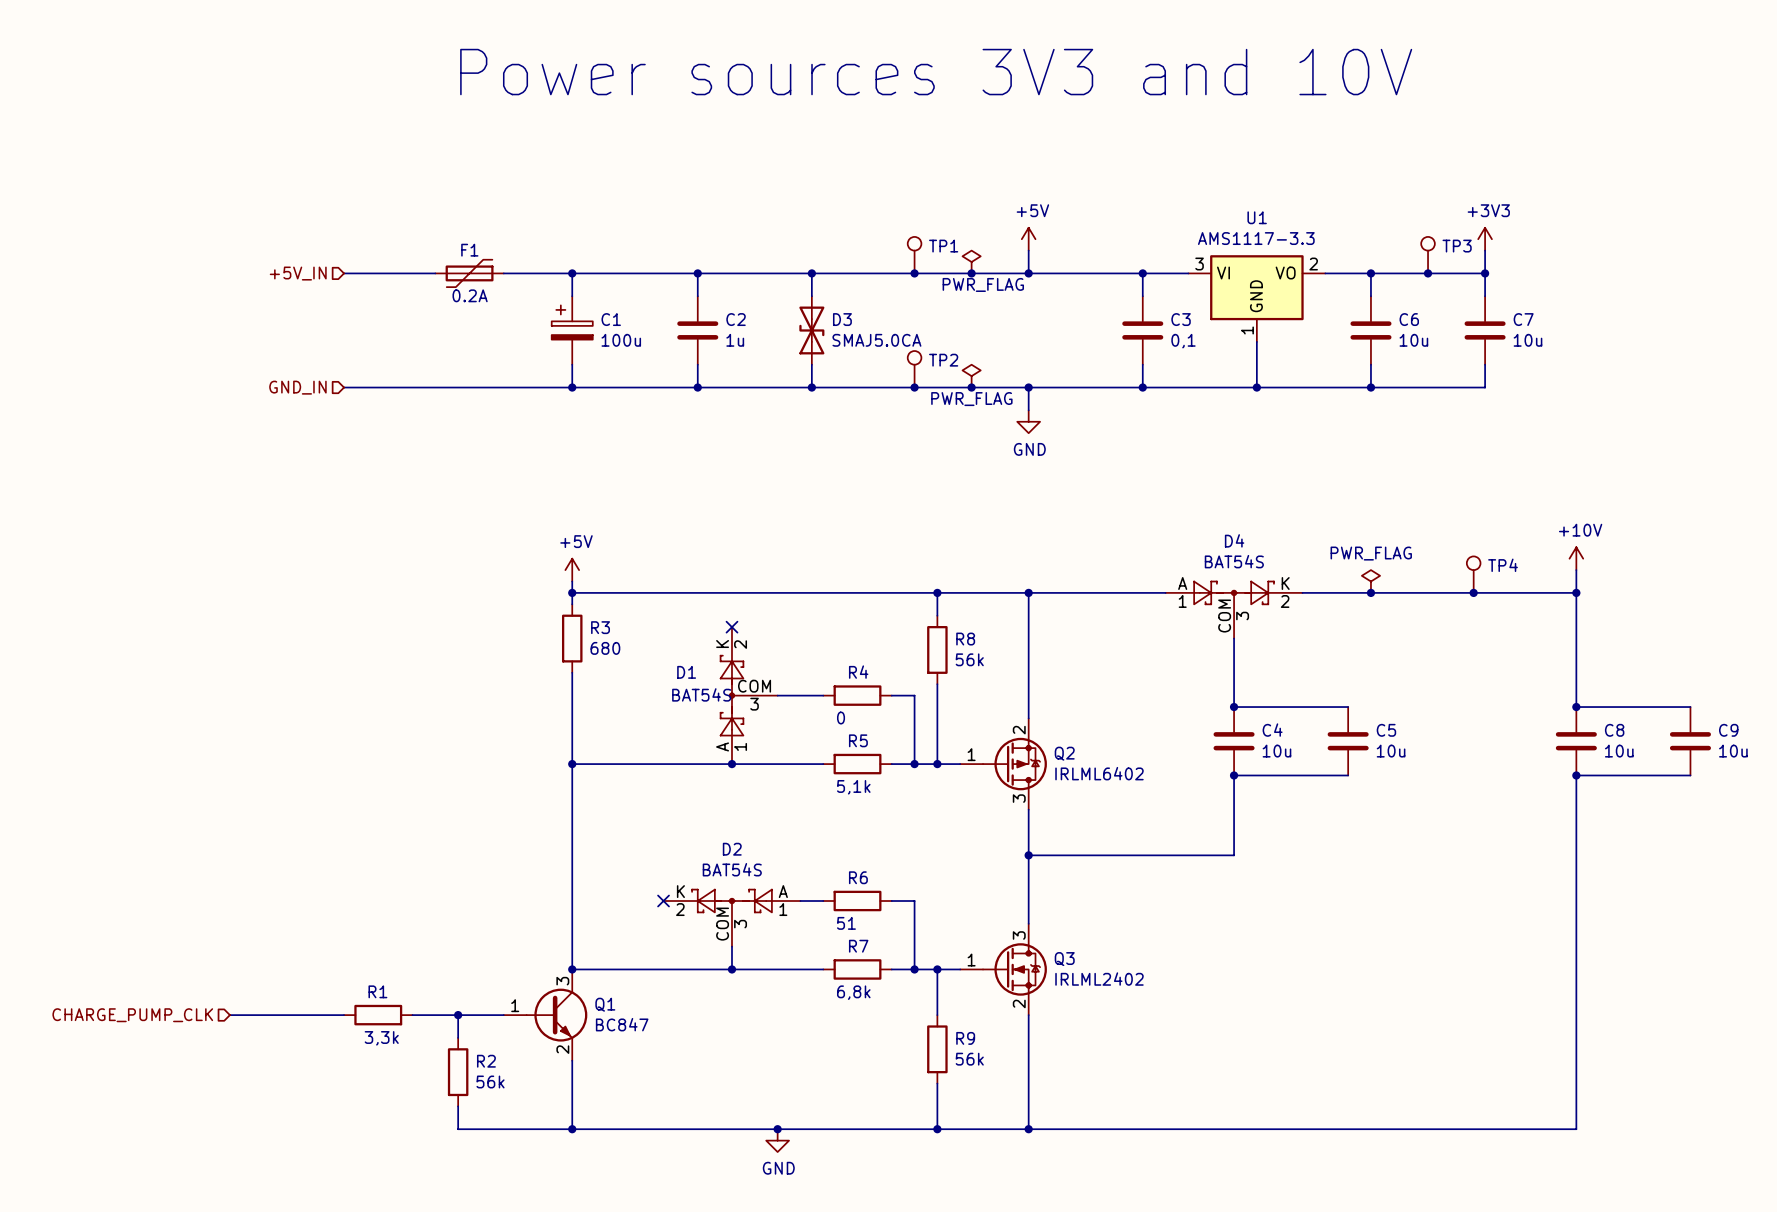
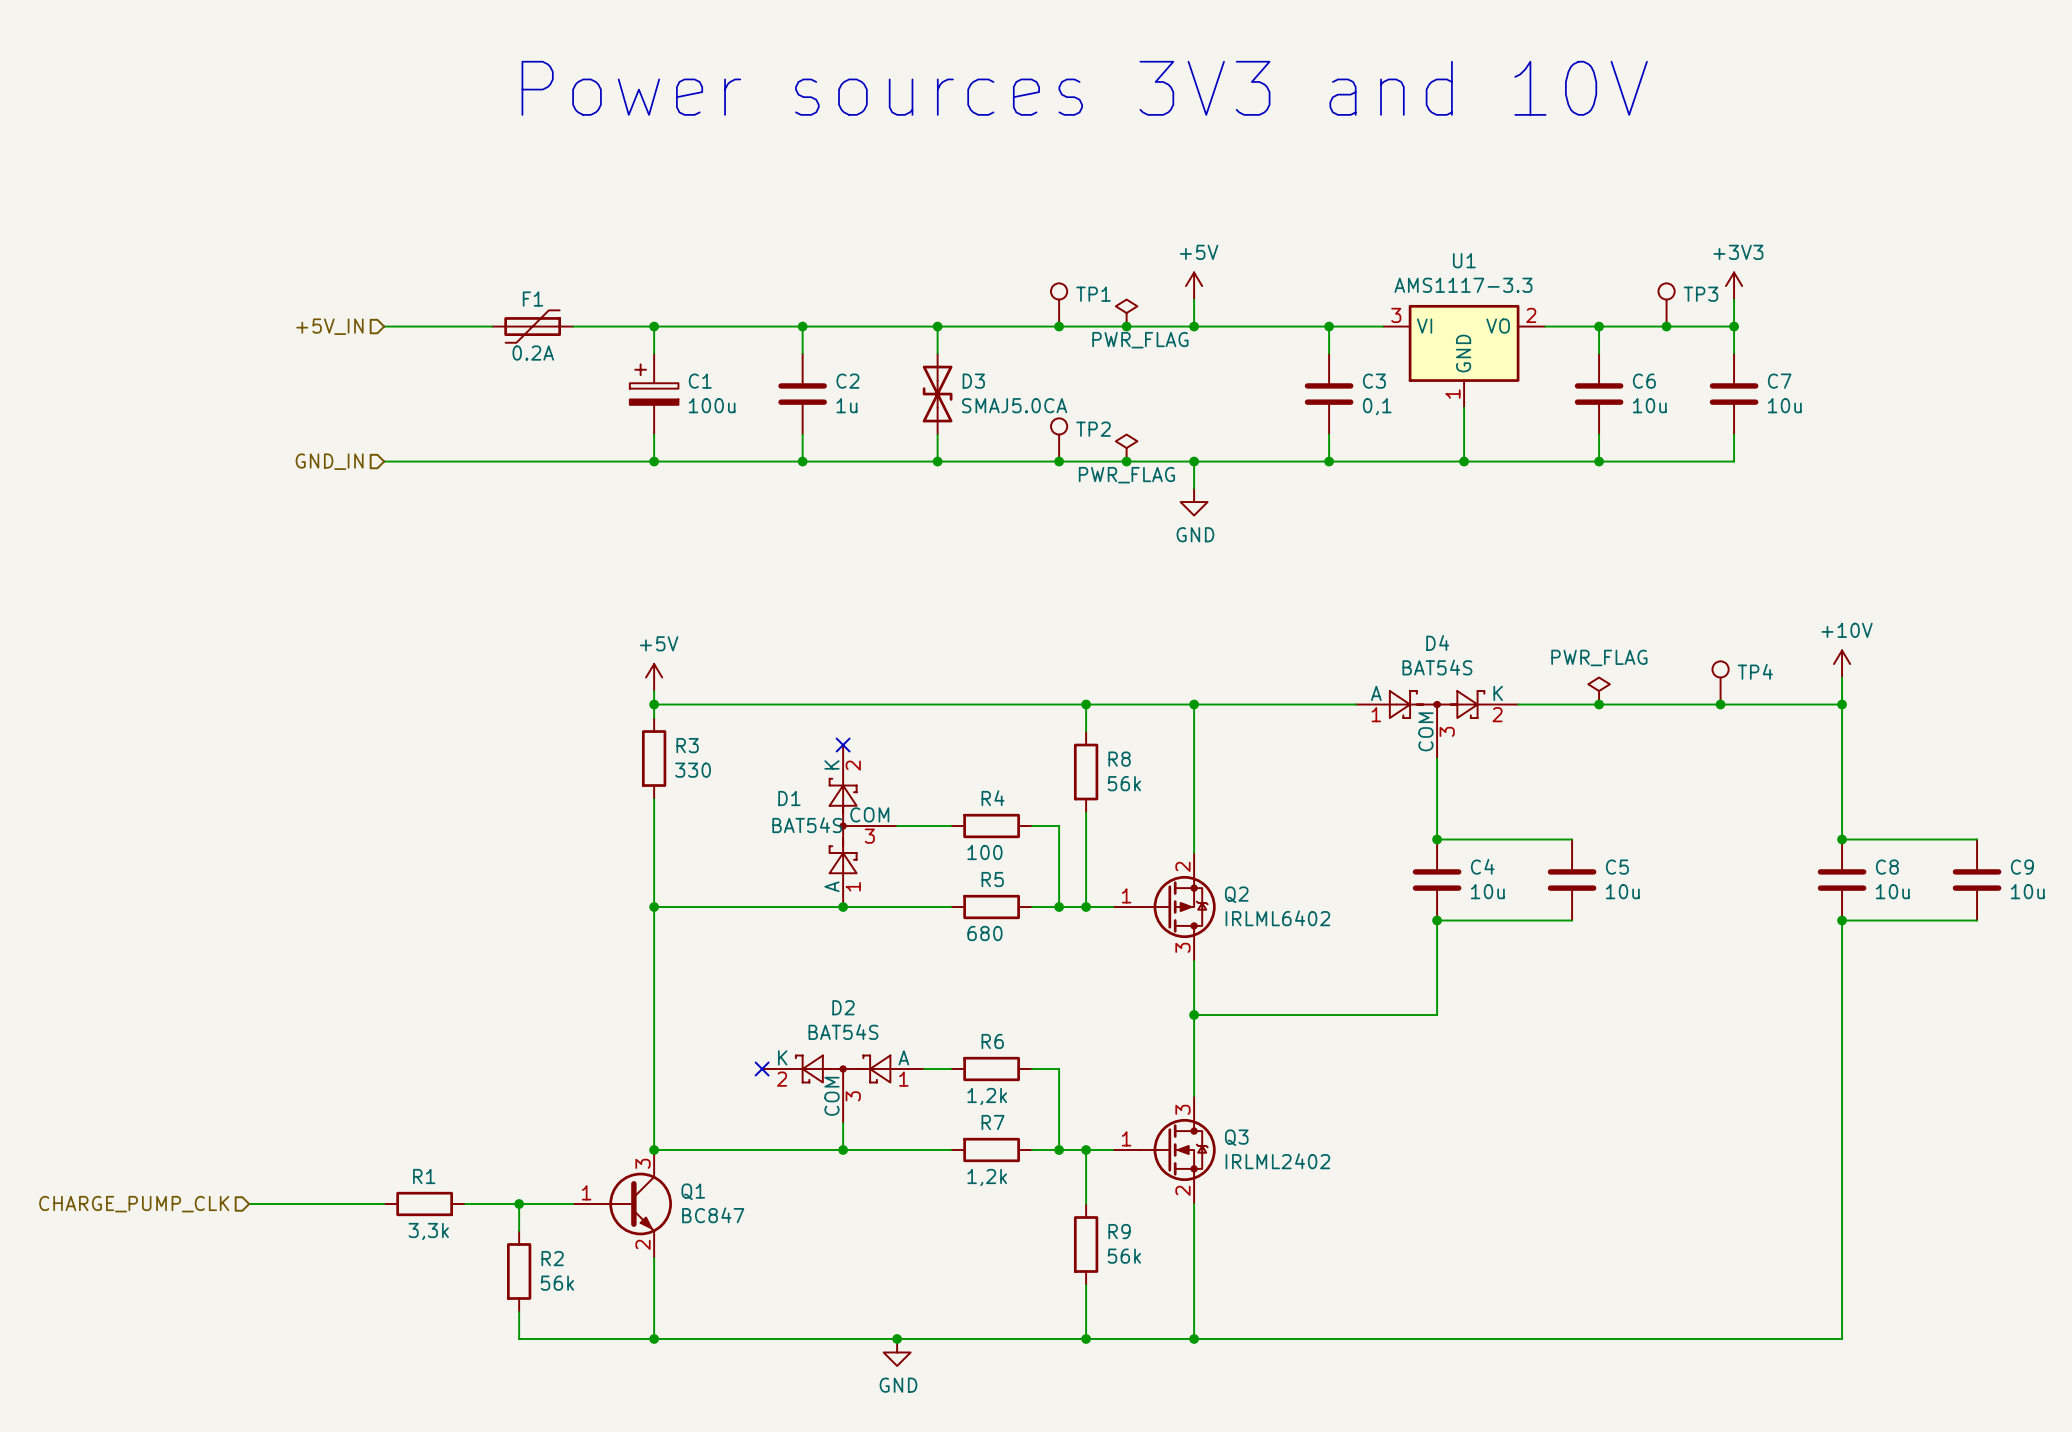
R3 value: 680 (605, 648) -> 330 (693, 770)
R4 value: 0 (841, 718) -> 100 (984, 852)
R5 value: 5,1k (853, 787) -> 680 (984, 933)
R6 value: 51 (846, 923) -> 1,2k (987, 1096)
R7 value: 6,8k (853, 992) -> 1,2k (987, 1177)

